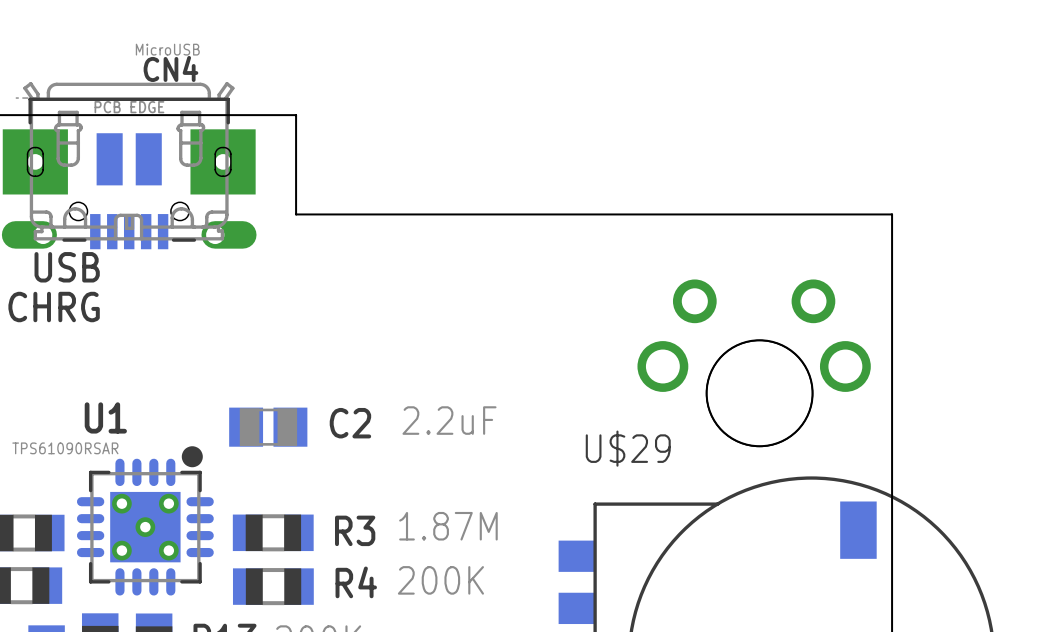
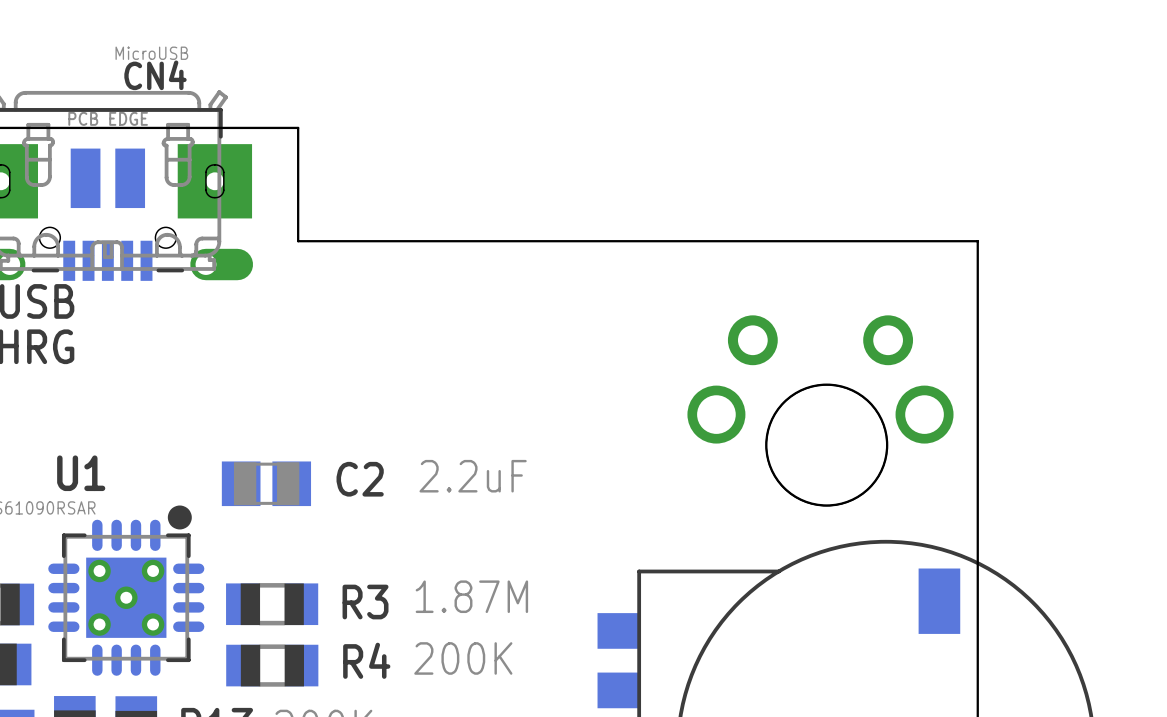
U$29 name: U$29 (628, 448) -> none

